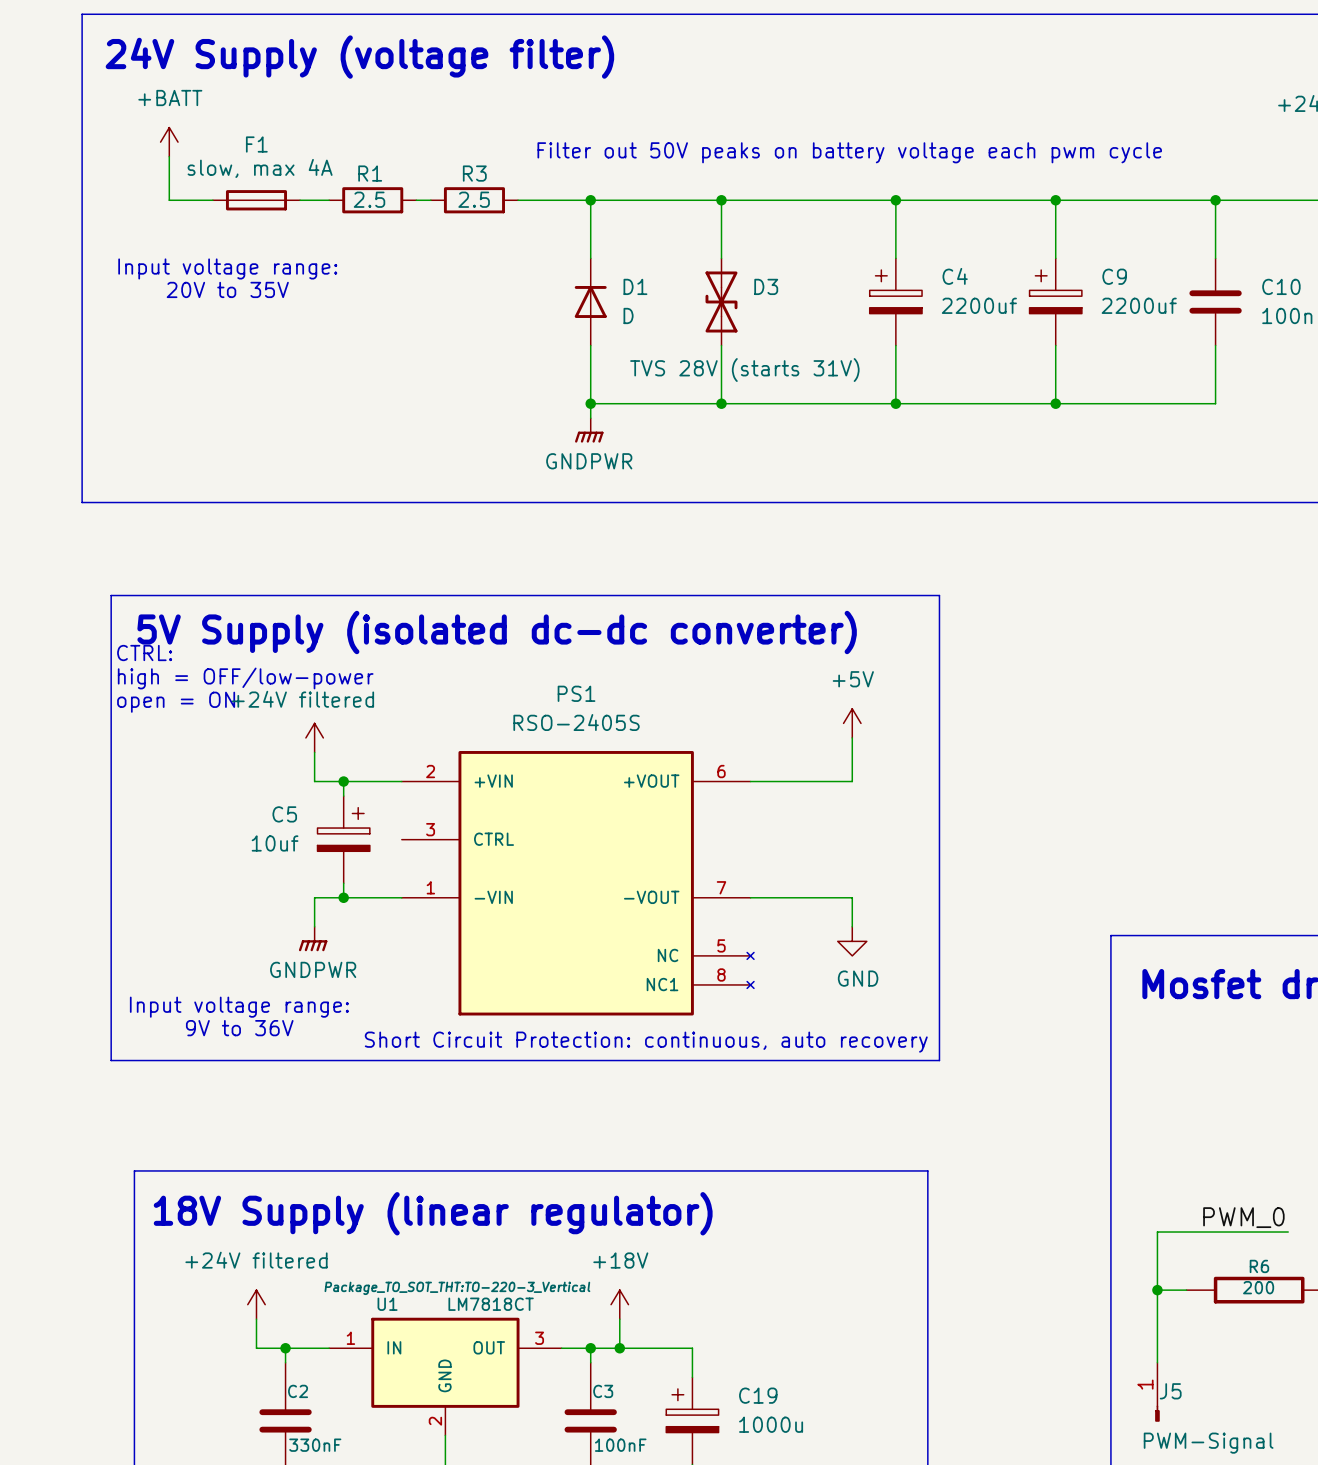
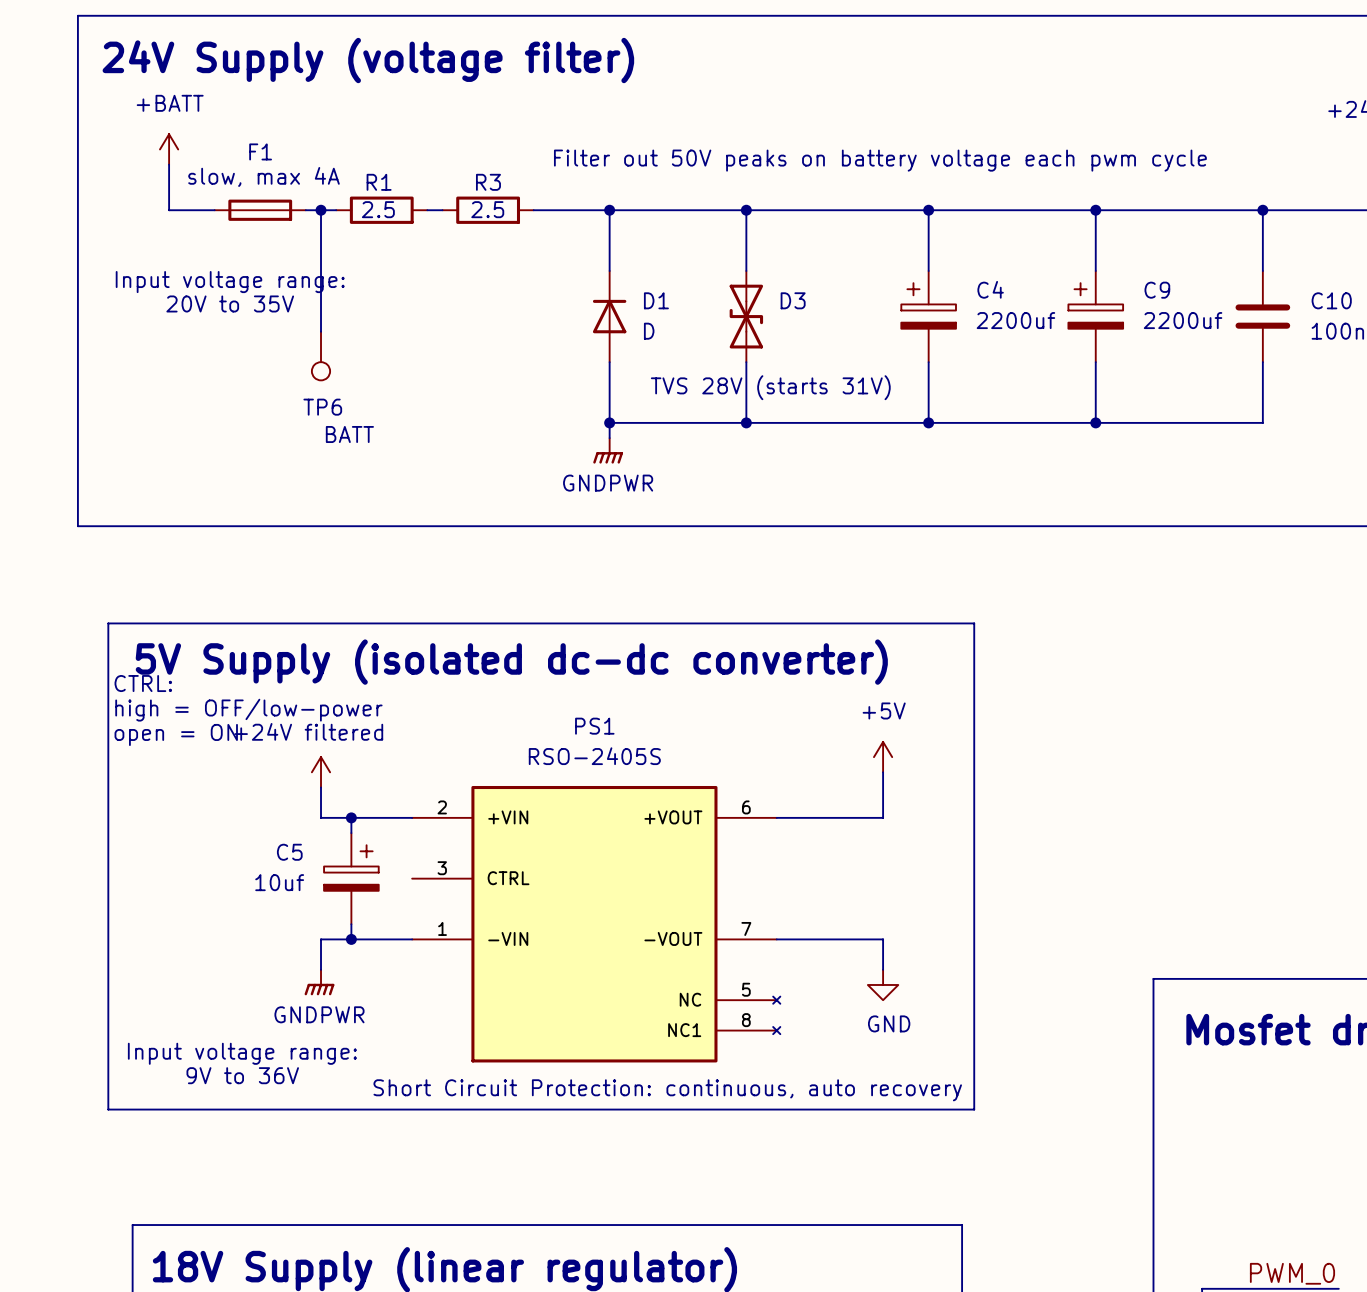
wire: none -> (321, 210) (321, 331)
junction: none -> (321, 210)
TP6: none -> BATT (321, 356)

